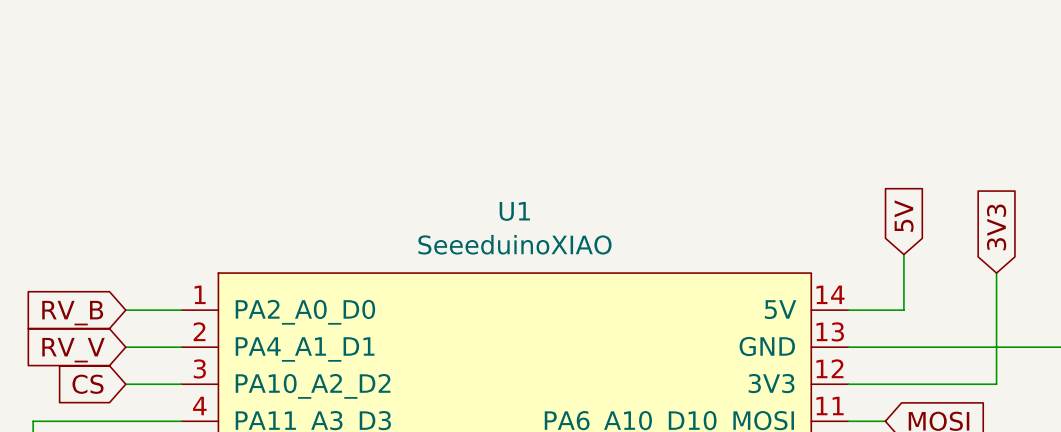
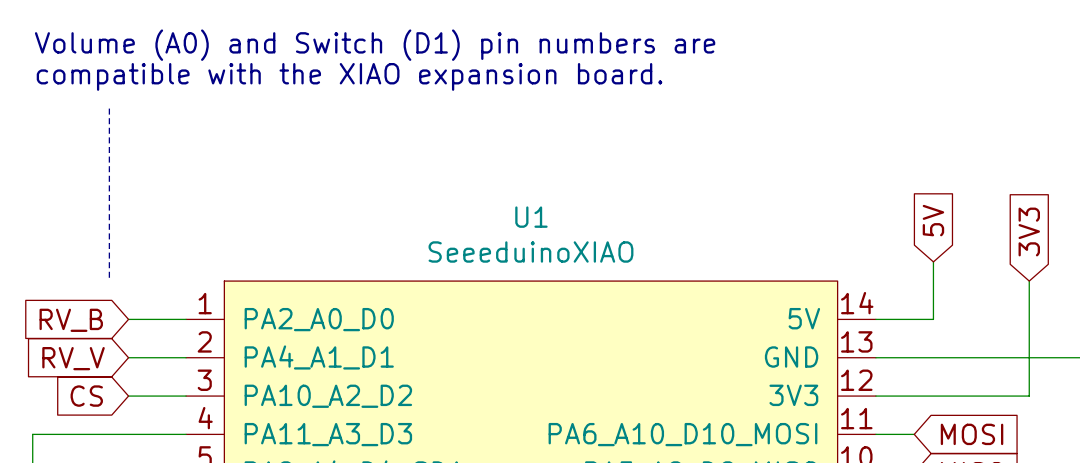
text: none -> Volume (A0) and Switch (D1) pin numbers are (375, 45)
text: none -> compatible with the XIAO expansion board. (349, 76)
line: none -> (109, 108) (109, 281)

